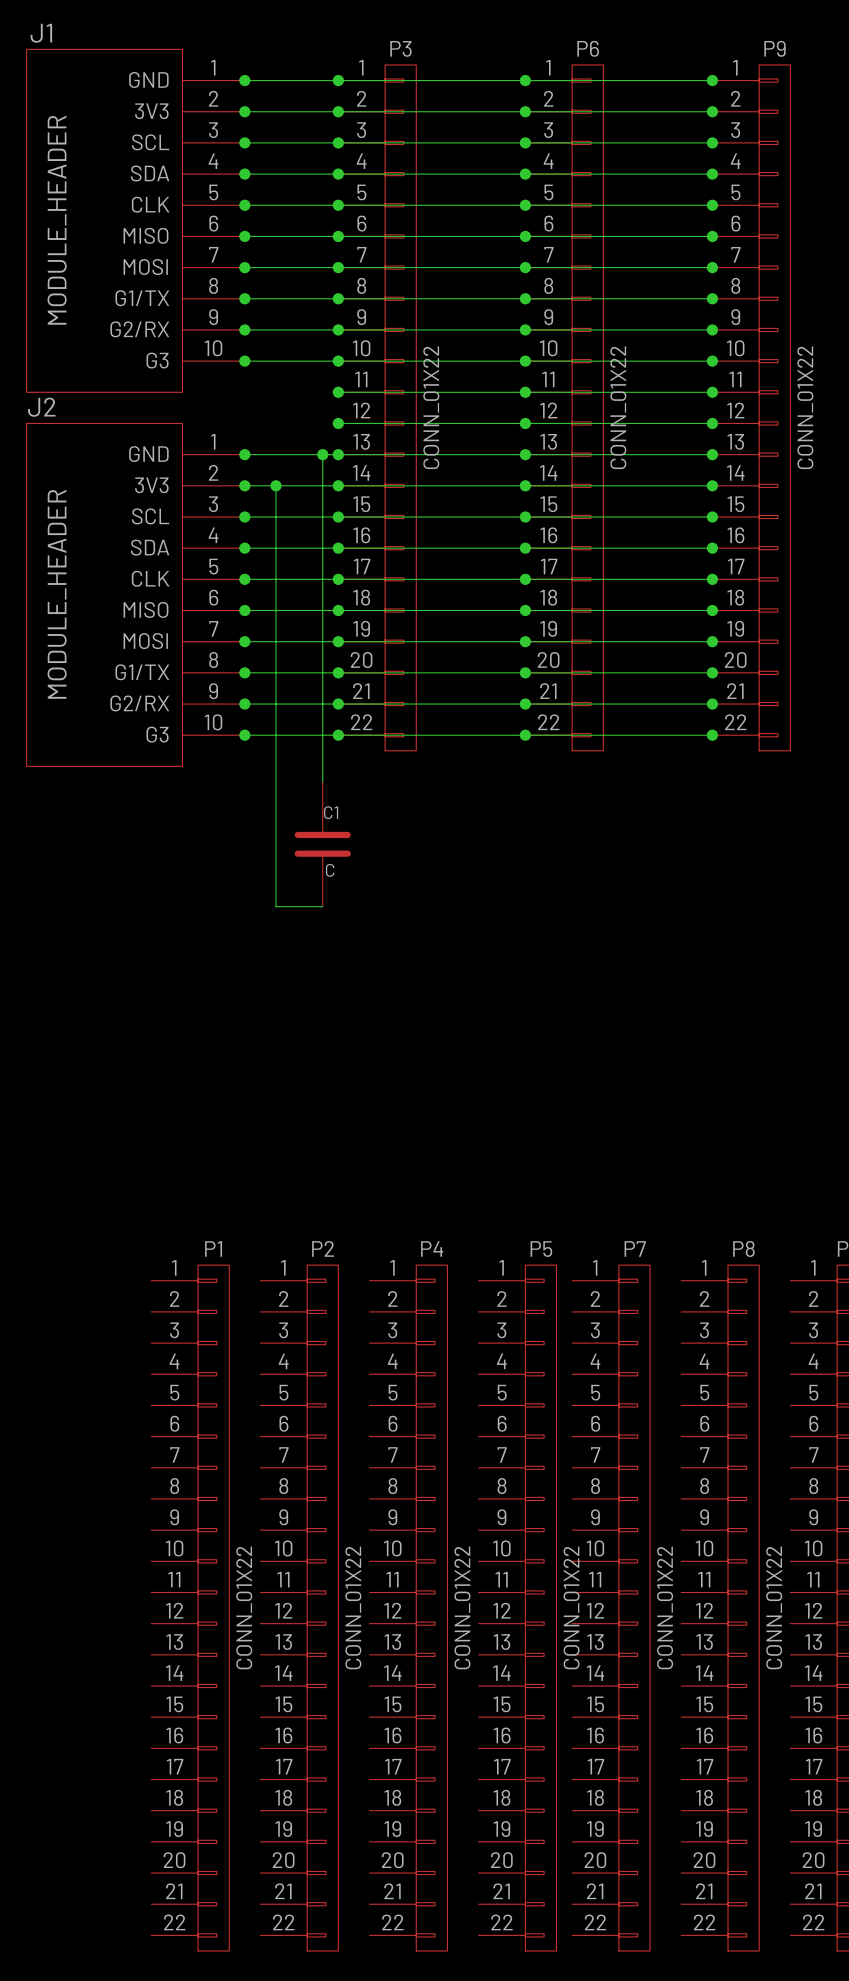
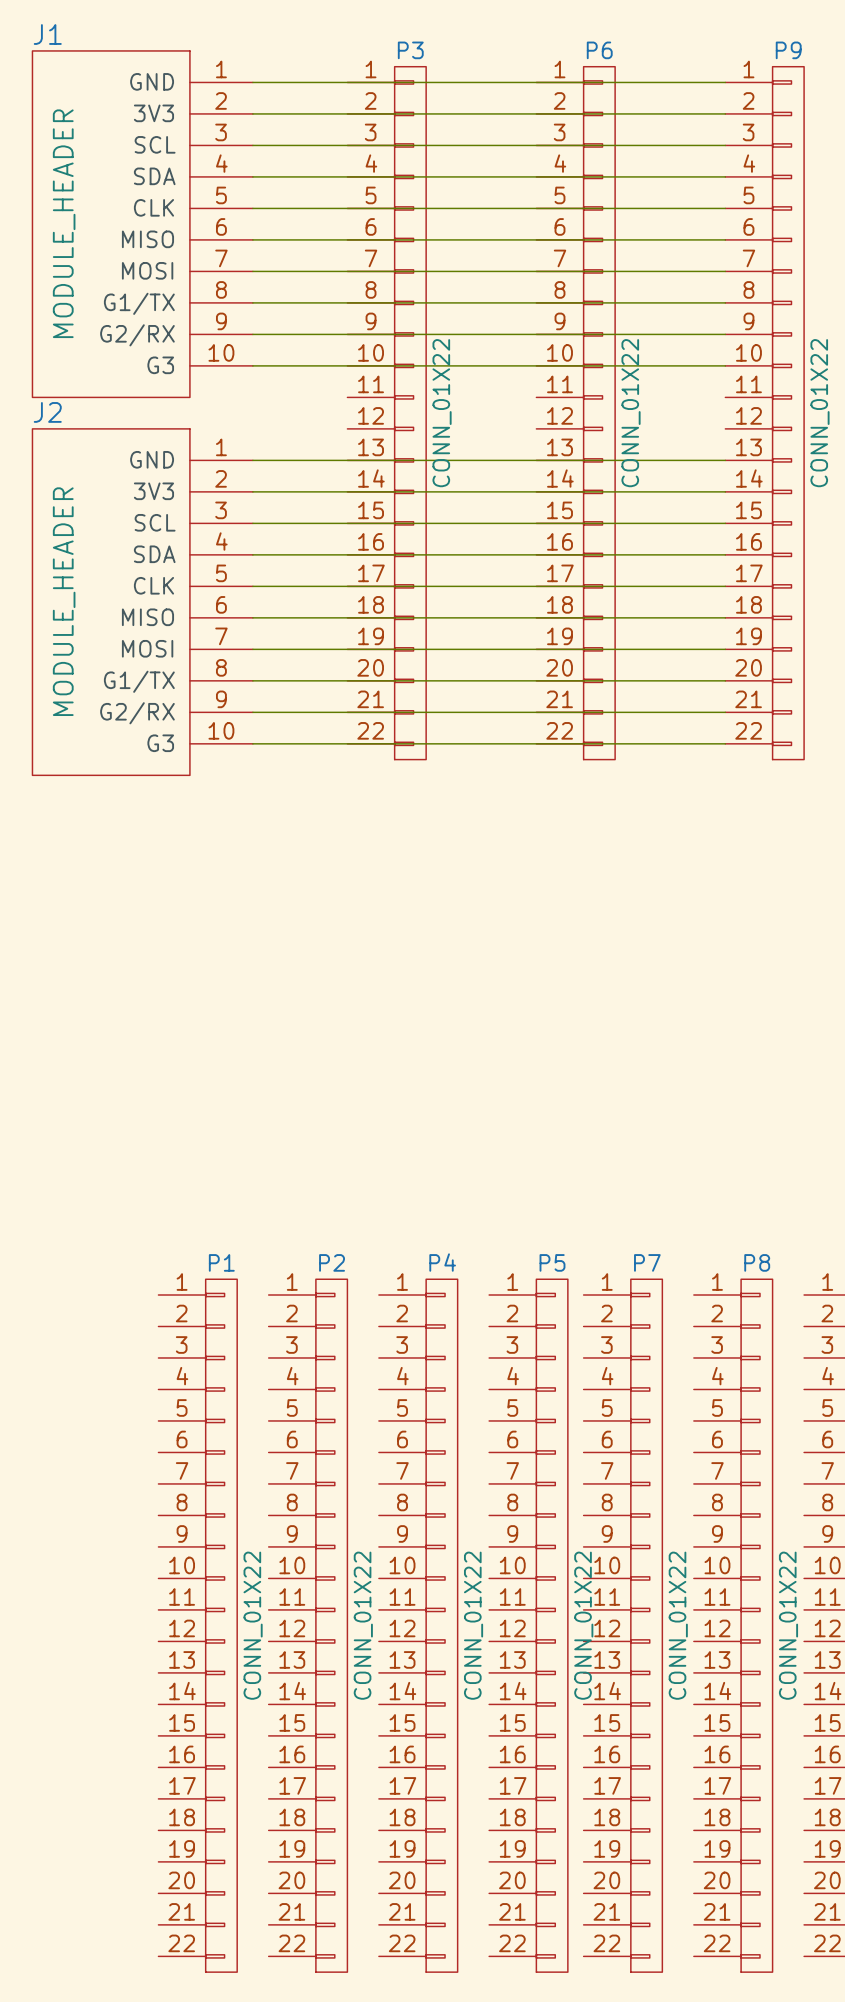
junction: (244, 80) -> none
junction: (338, 80) -> none
junction: (525, 80) -> none
junction: (712, 80) -> none
junction: (244, 111) -> none
junction: (338, 111) -> none
junction: (525, 111) -> none
junction: (712, 111) -> none
junction: (244, 142) -> none
junction: (338, 142) -> none
junction: (525, 142) -> none
junction: (712, 142) -> none
junction: (244, 174) -> none
junction: (338, 174) -> none
junction: (525, 174) -> none
junction: (712, 174) -> none
junction: (244, 205) -> none
junction: (338, 205) -> none
junction: (525, 205) -> none
junction: (712, 205) -> none
junction: (244, 236) -> none
junction: (338, 236) -> none
junction: (525, 236) -> none
junction: (712, 236) -> none
junction: (244, 267) -> none
junction: (338, 267) -> none
junction: (525, 267) -> none
junction: (712, 267) -> none
junction: (244, 298) -> none
junction: (338, 298) -> none
junction: (525, 298) -> none
junction: (712, 298) -> none
junction: (244, 329) -> none
junction: (338, 329) -> none
junction: (525, 329) -> none
junction: (712, 329) -> none
junction: (244, 361) -> none
junction: (338, 361) -> none
junction: (525, 361) -> none
junction: (712, 361) -> none
wire: (338, 392) (712, 392) -> none
junction: (338, 392) -> none
junction: (525, 392) -> none
junction: (712, 392) -> none
wire: (338, 423) (712, 423) -> none
junction: (338, 423) -> none
junction: (525, 423) -> none
junction: (712, 423) -> none
junction: (244, 454) -> none
wire: (322, 454) (322, 781) -> none
junction: (322, 454) -> none
junction: (338, 454) -> none
junction: (525, 454) -> none
junction: (712, 454) -> none
junction: (244, 485) -> none
wire: (276, 485) (276, 906) (322, 906) -> none
junction: (276, 485) -> none
junction: (338, 485) -> none
junction: (525, 485) -> none
junction: (712, 485) -> none
junction: (244, 516) -> none
junction: (338, 516) -> none
junction: (525, 516) -> none
junction: (712, 516) -> none
junction: (244, 548) -> none
junction: (338, 548) -> none
junction: (525, 548) -> none
junction: (712, 548) -> none
junction: (244, 579) -> none
junction: (338, 579) -> none
junction: (525, 579) -> none
junction: (712, 579) -> none
junction: (244, 610) -> none
junction: (338, 610) -> none
junction: (525, 610) -> none
junction: (712, 610) -> none
junction: (244, 641) -> none
junction: (338, 641) -> none
junction: (525, 641) -> none
junction: (712, 641) -> none
junction: (244, 672) -> none
junction: (338, 672) -> none
junction: (525, 672) -> none
junction: (712, 672) -> none
junction: (244, 704) -> none
junction: (338, 704) -> none
junction: (525, 704) -> none
junction: (712, 704) -> none
junction: (244, 735) -> none
junction: (338, 735) -> none
junction: (525, 735) -> none
junction: (712, 735) -> none
C1: C (322, 844) -> none

